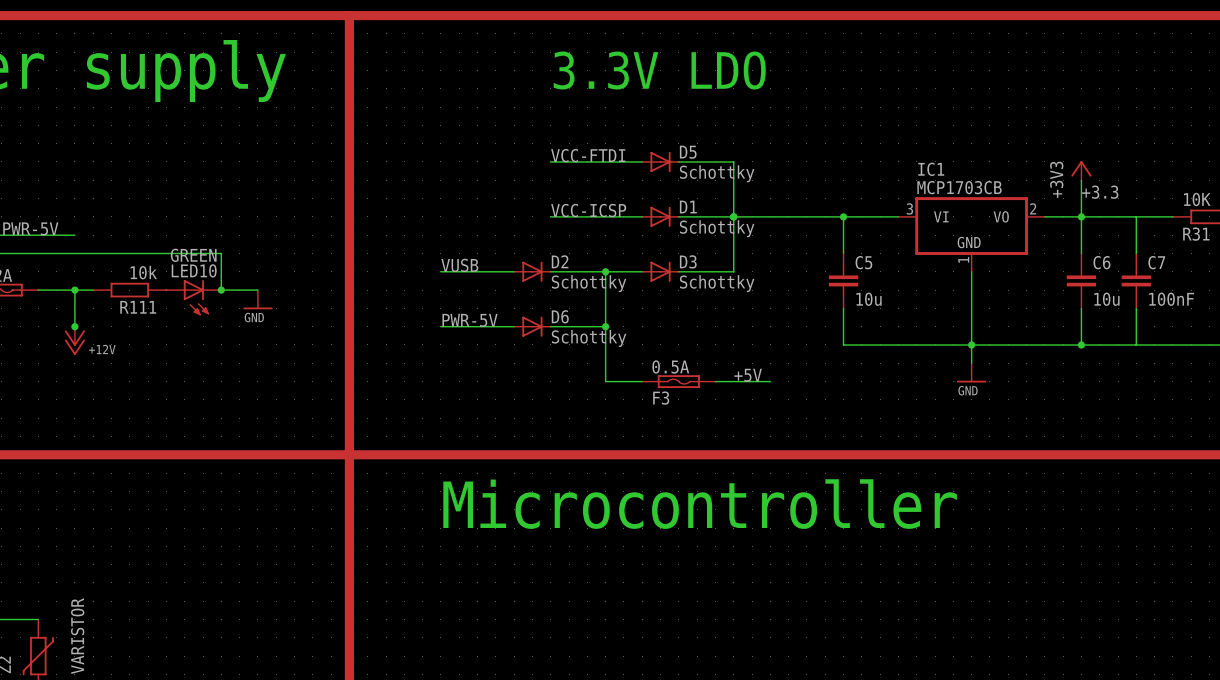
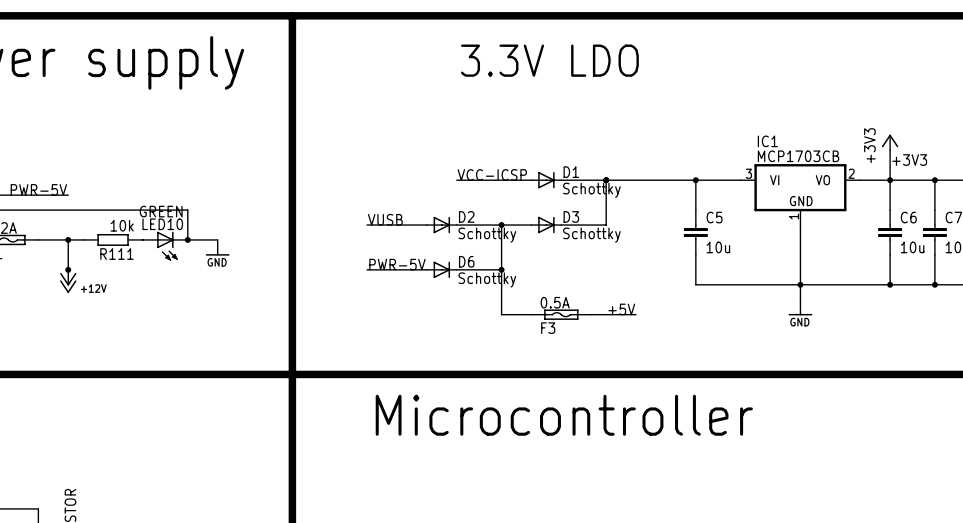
label: VCC-FTDI (588, 155) -> none
wire: (550, 161) (642, 161) -> none
D5: Schottky (660, 161) -> none
wire: (678, 161) (733, 161) (733, 216) -> none
label: +3.3 (1100, 192) -> +3V3 (909, 160)
junction: none -> (934, 180)
junction: none -> (934, 284)

